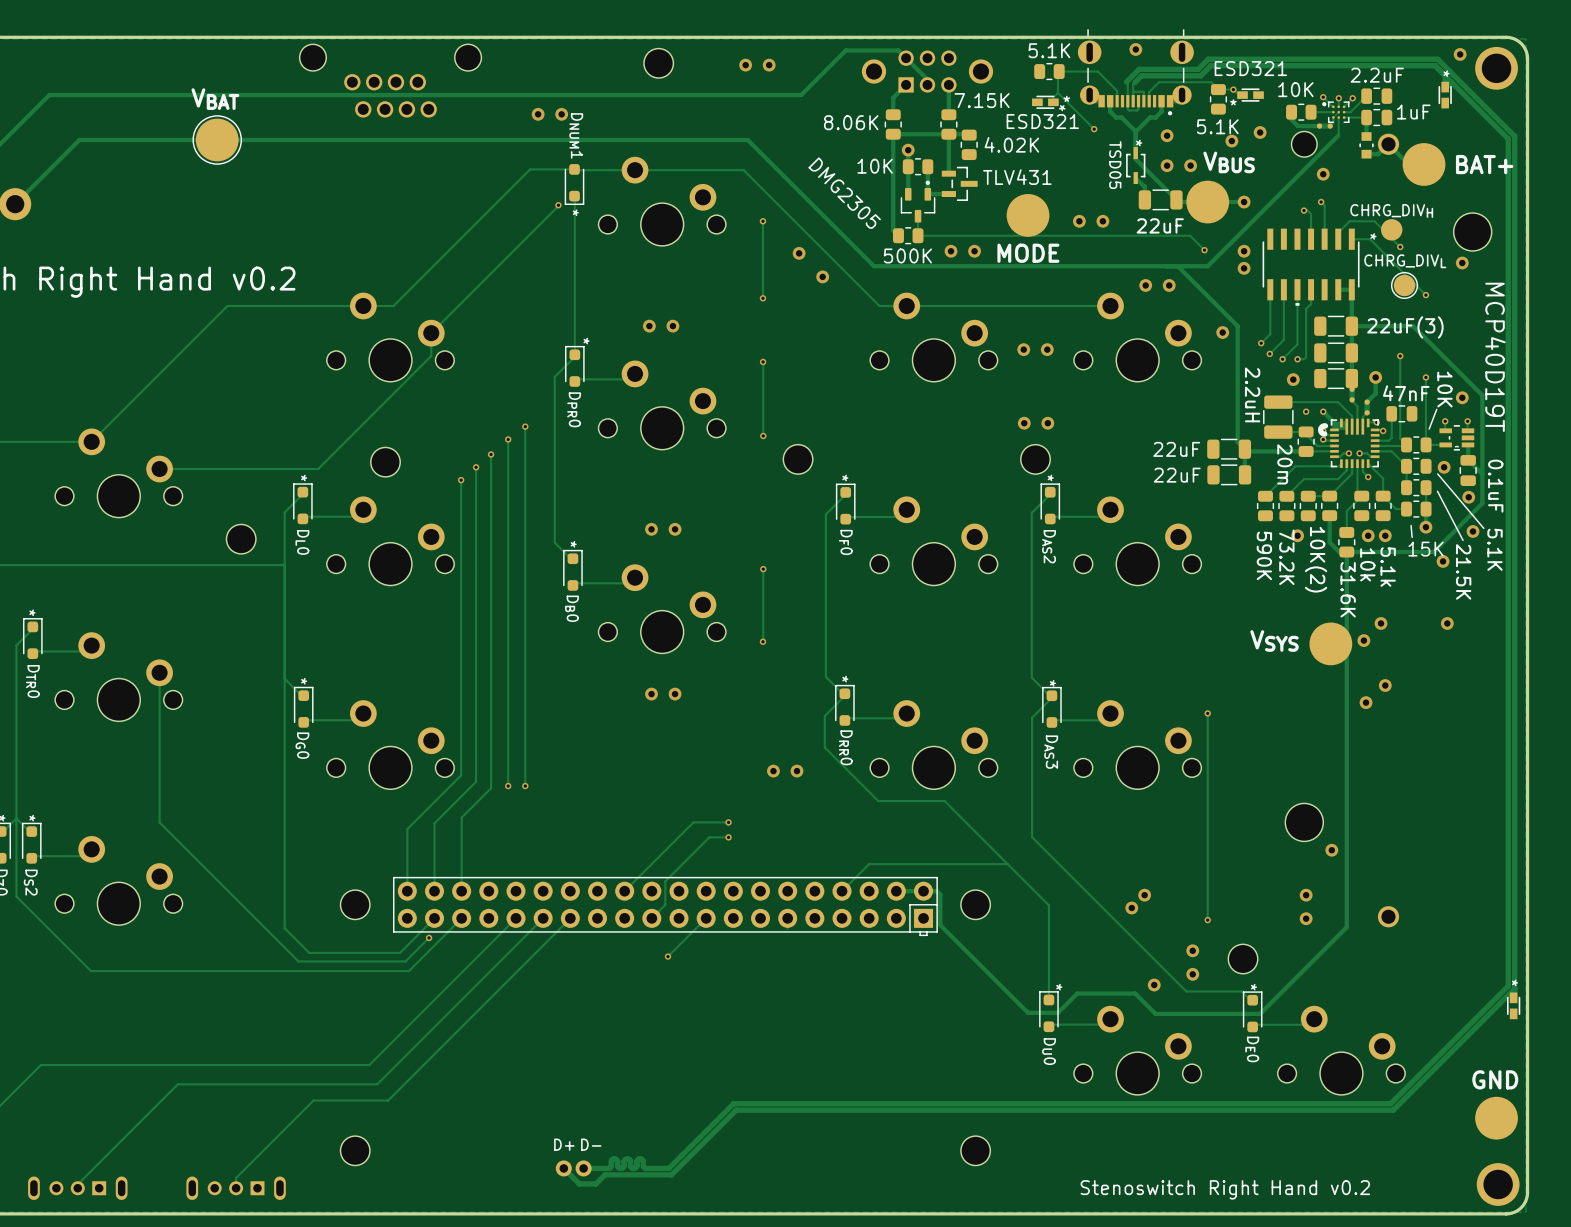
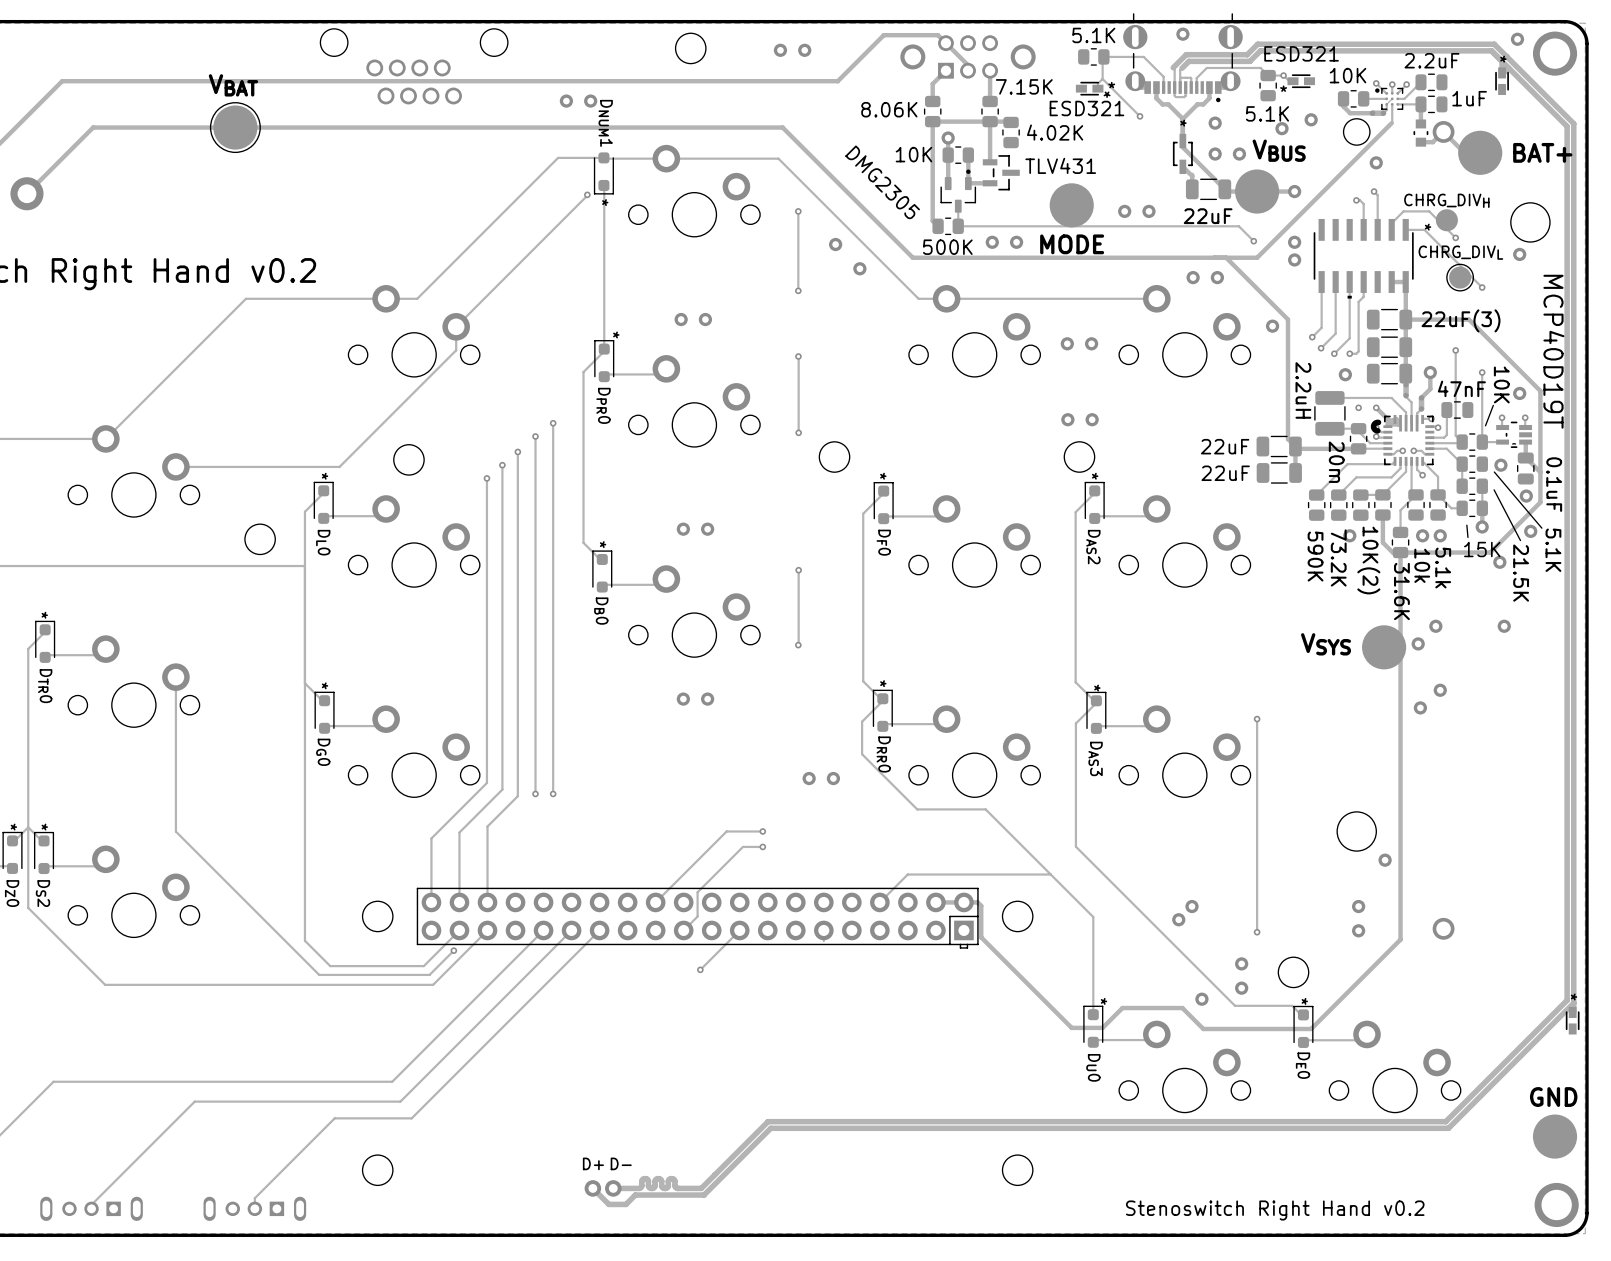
part footprint: [1126, 147, 1146, 185] -> [1172, 133, 1193, 174]
part value: TSD05 (1115, 165) -> none

